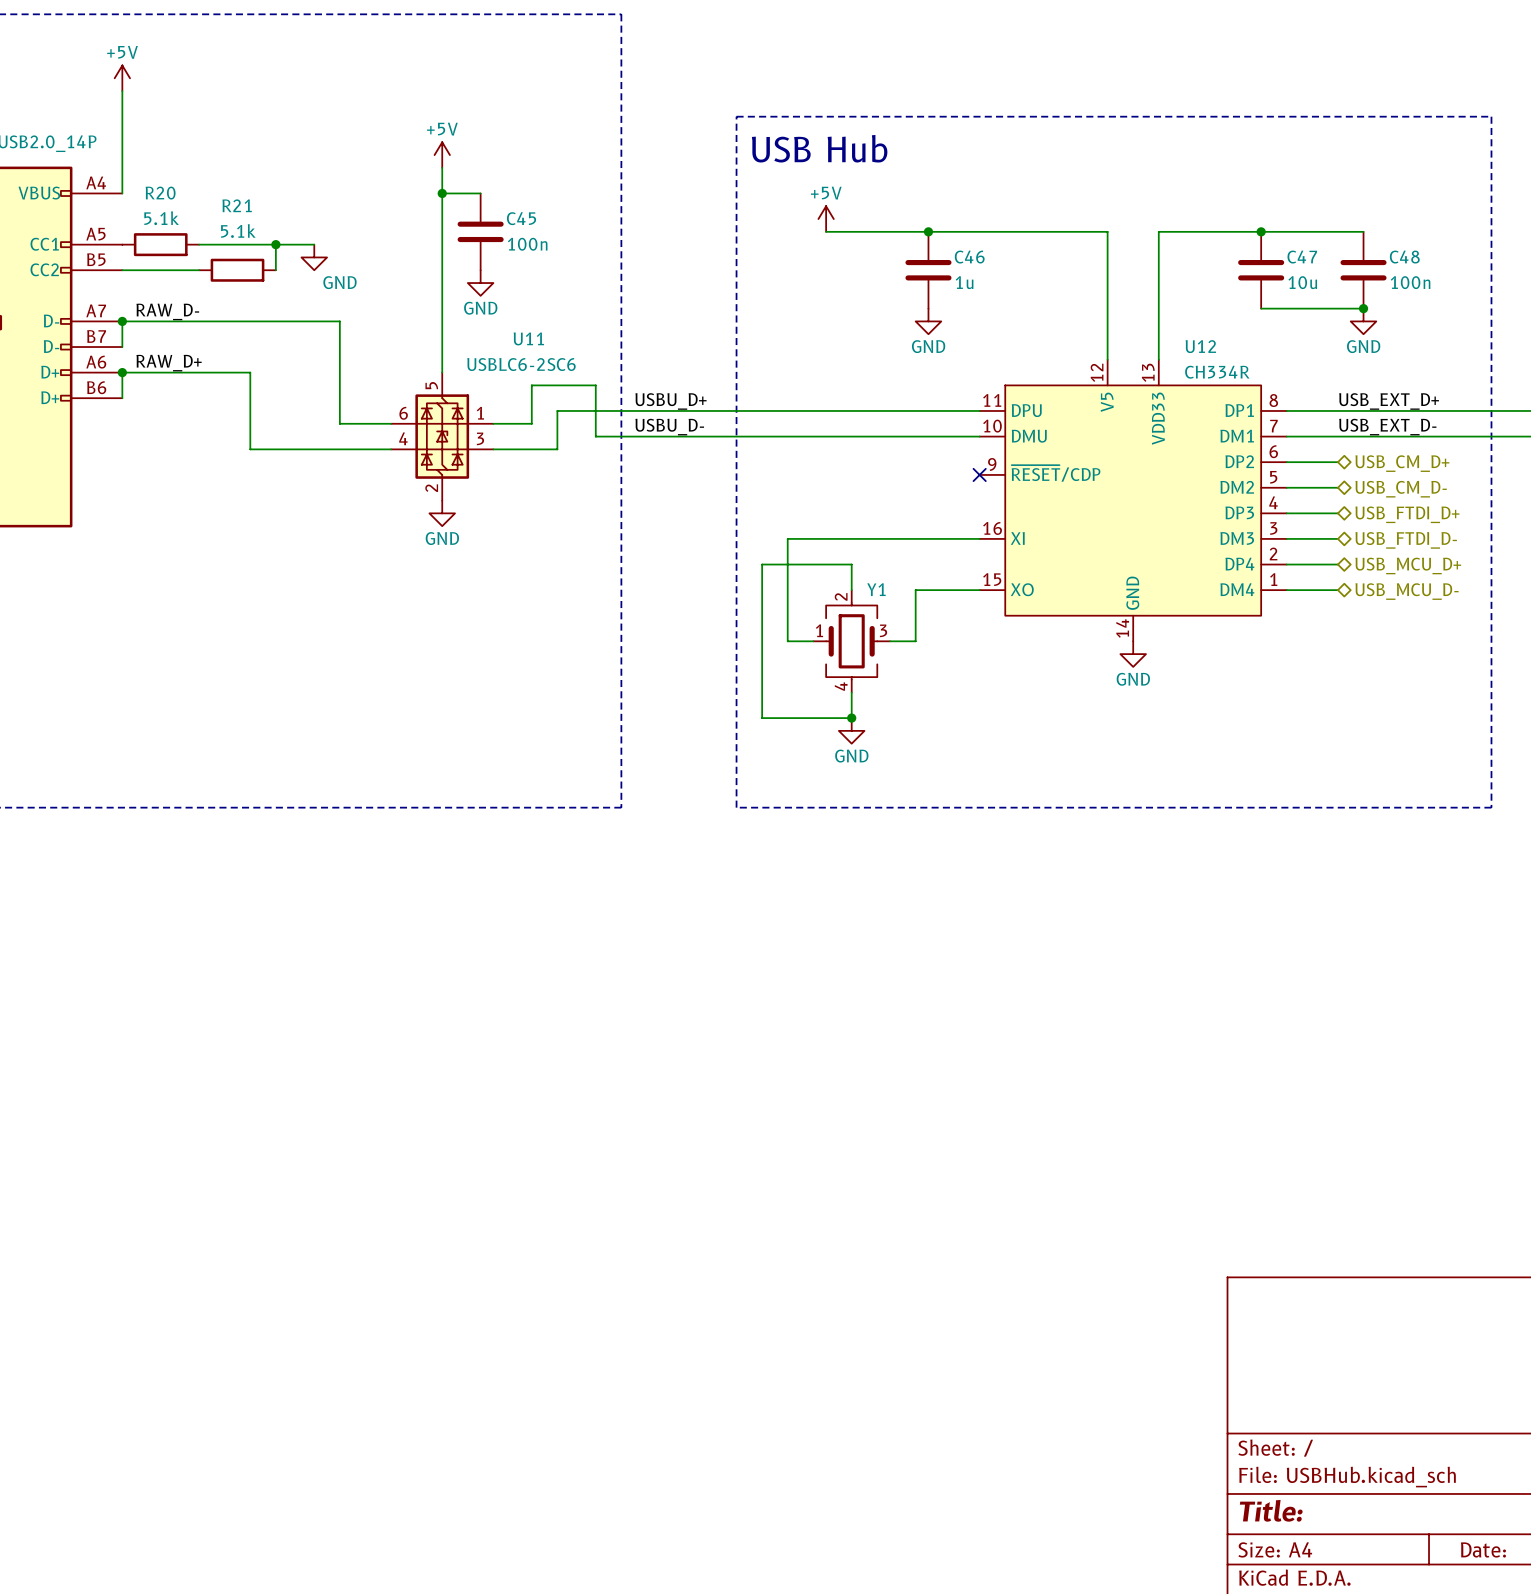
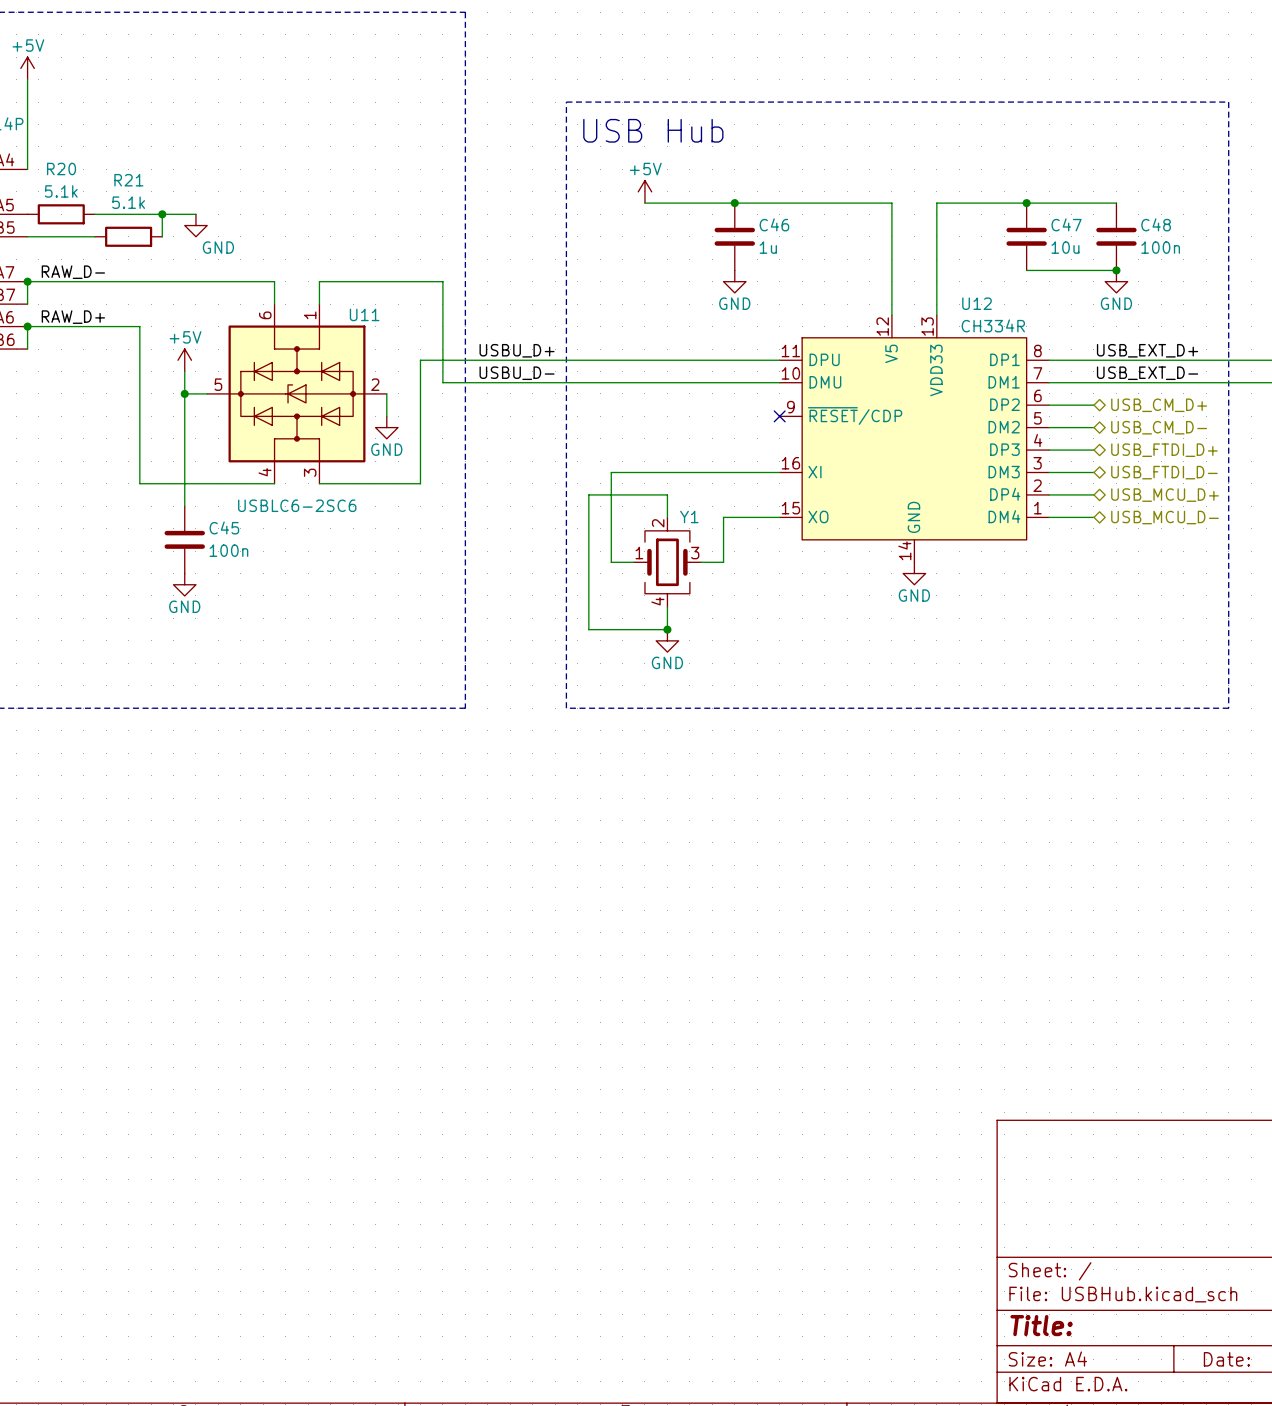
power symbol: +5V (442, 155) -> none
wire: (442, 167) (442, 372) -> none
wire: (442, 193) (480, 193) -> none
junction: (442, 193) -> none
C45 position: (480, 231) -> (184, 539)
power symbol: GND (480, 283) -> none
wire: (339, 321) (339, 423) (391, 423) -> (218, 281) (274, 281) (274, 304)
U11 value position: USBLC6-2SC6 (521, 364) -> USBLC6-2SC6 (297, 505)
U11 symbol: [391, 372, 494, 501] -> [207, 304, 387, 484]
wire: (595, 385) (531, 385) (531, 423) (493, 423) -> (442, 337) (442, 281) (319, 281) (319, 304)
power symbol: none -> +5V (184, 360)
wire: (570, 410) (557, 410) (557, 449) (493, 449) -> (420, 360) (420, 483) (319, 483)
wire: none -> (184, 371) (184, 506)
wire: (250, 449) (301, 449) -> (139, 393) (139, 483) (274, 483)
junction: none -> (184, 393)
wire: none -> (386, 393) (386, 416)
power symbol position: GND (442, 513) -> GND (386, 427)
power symbol: none -> GND (184, 584)

